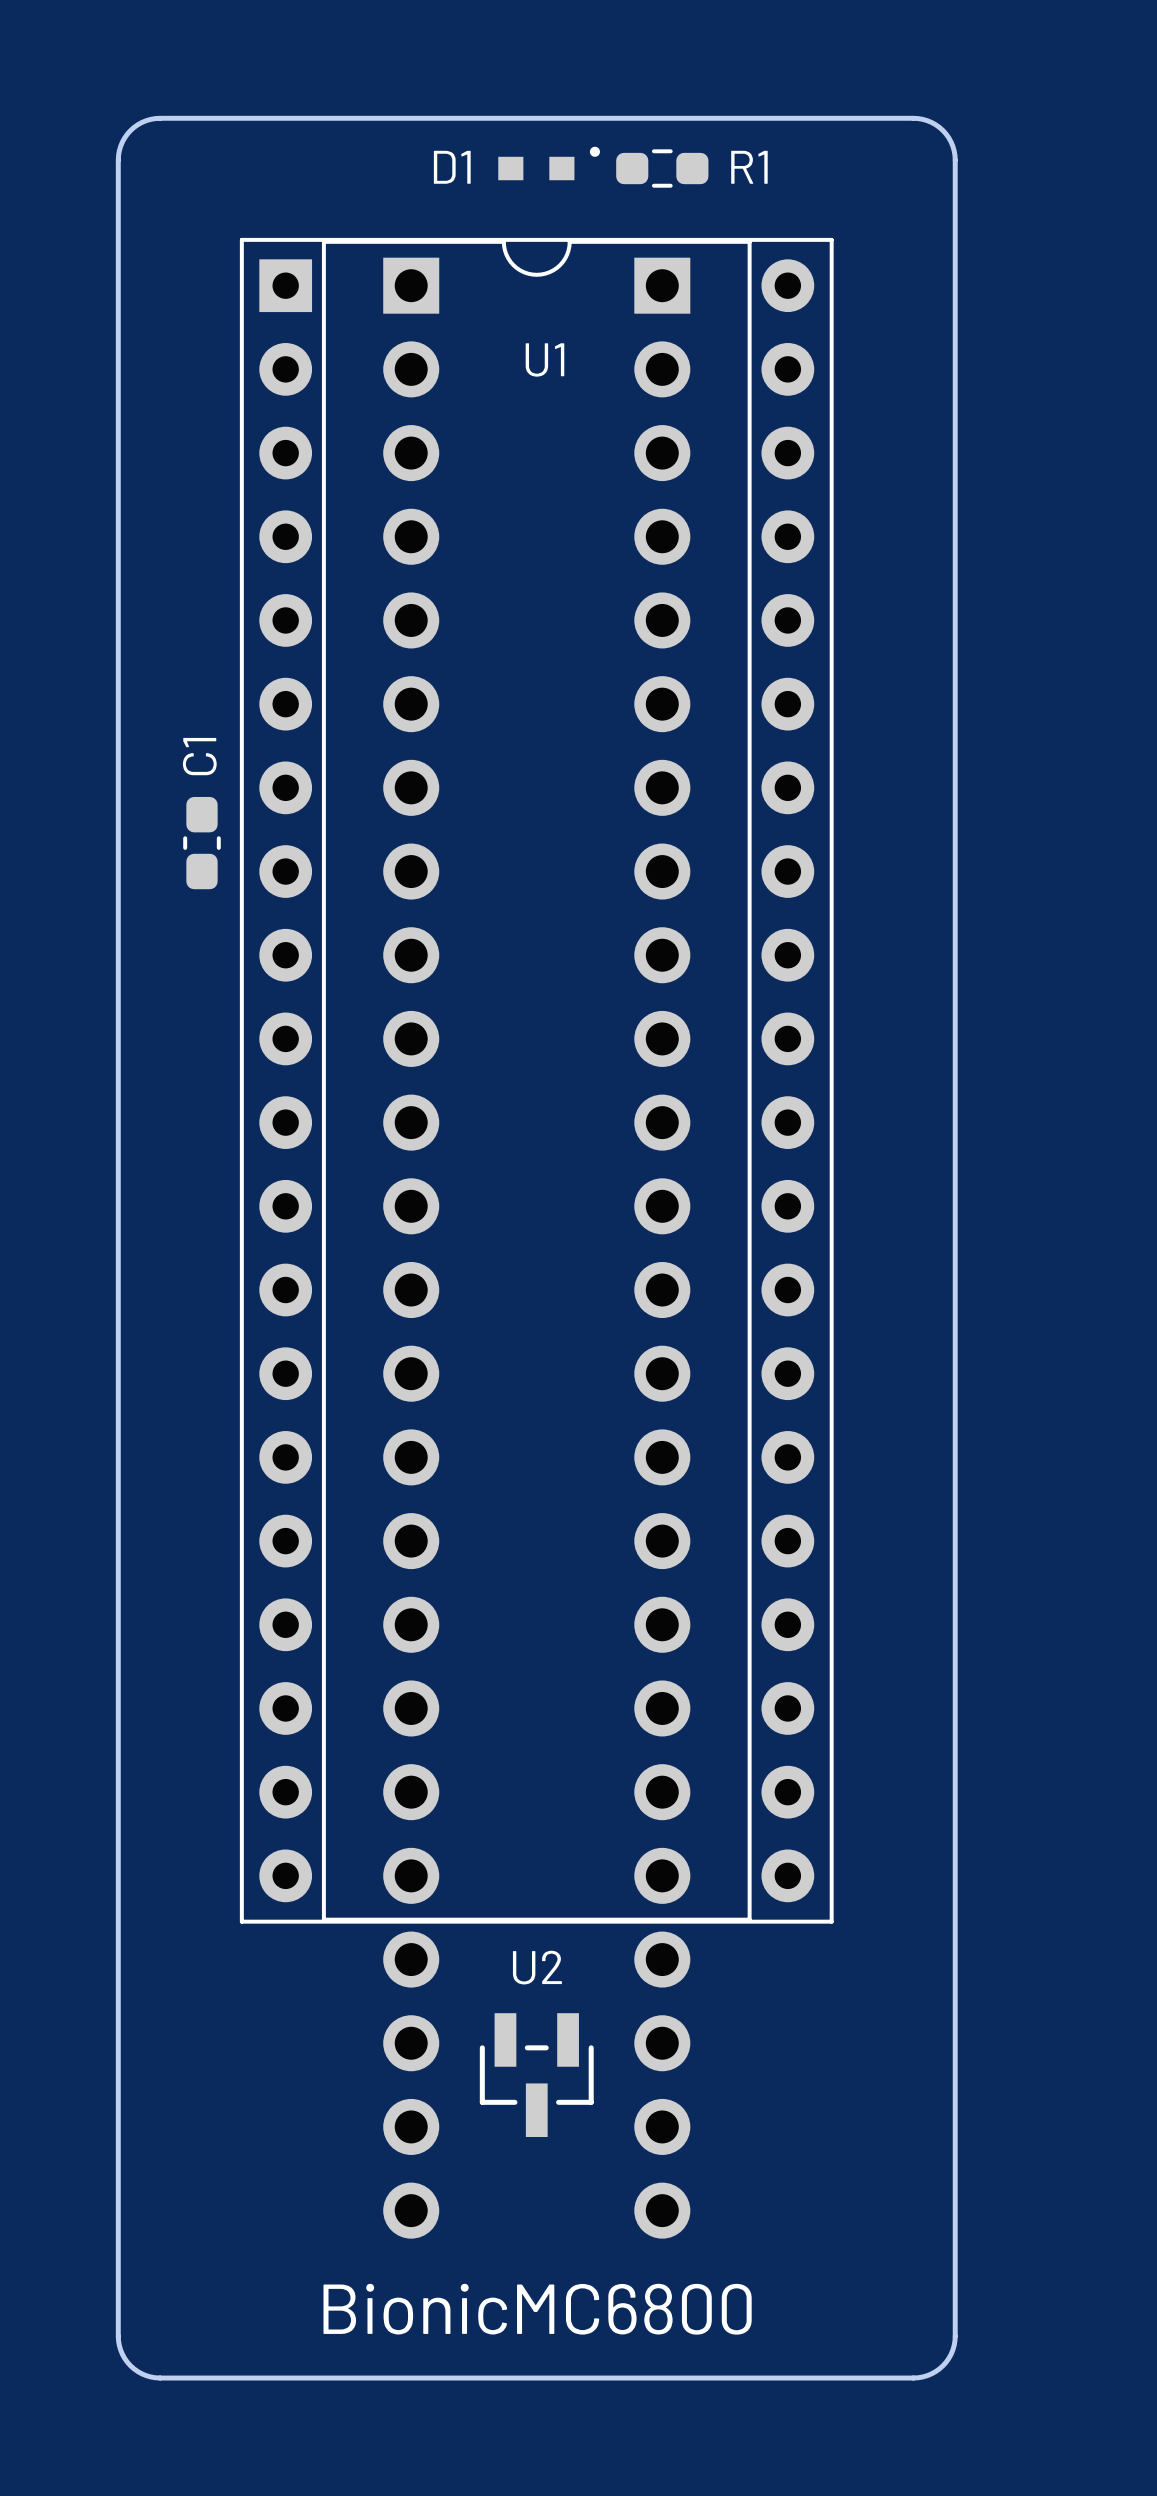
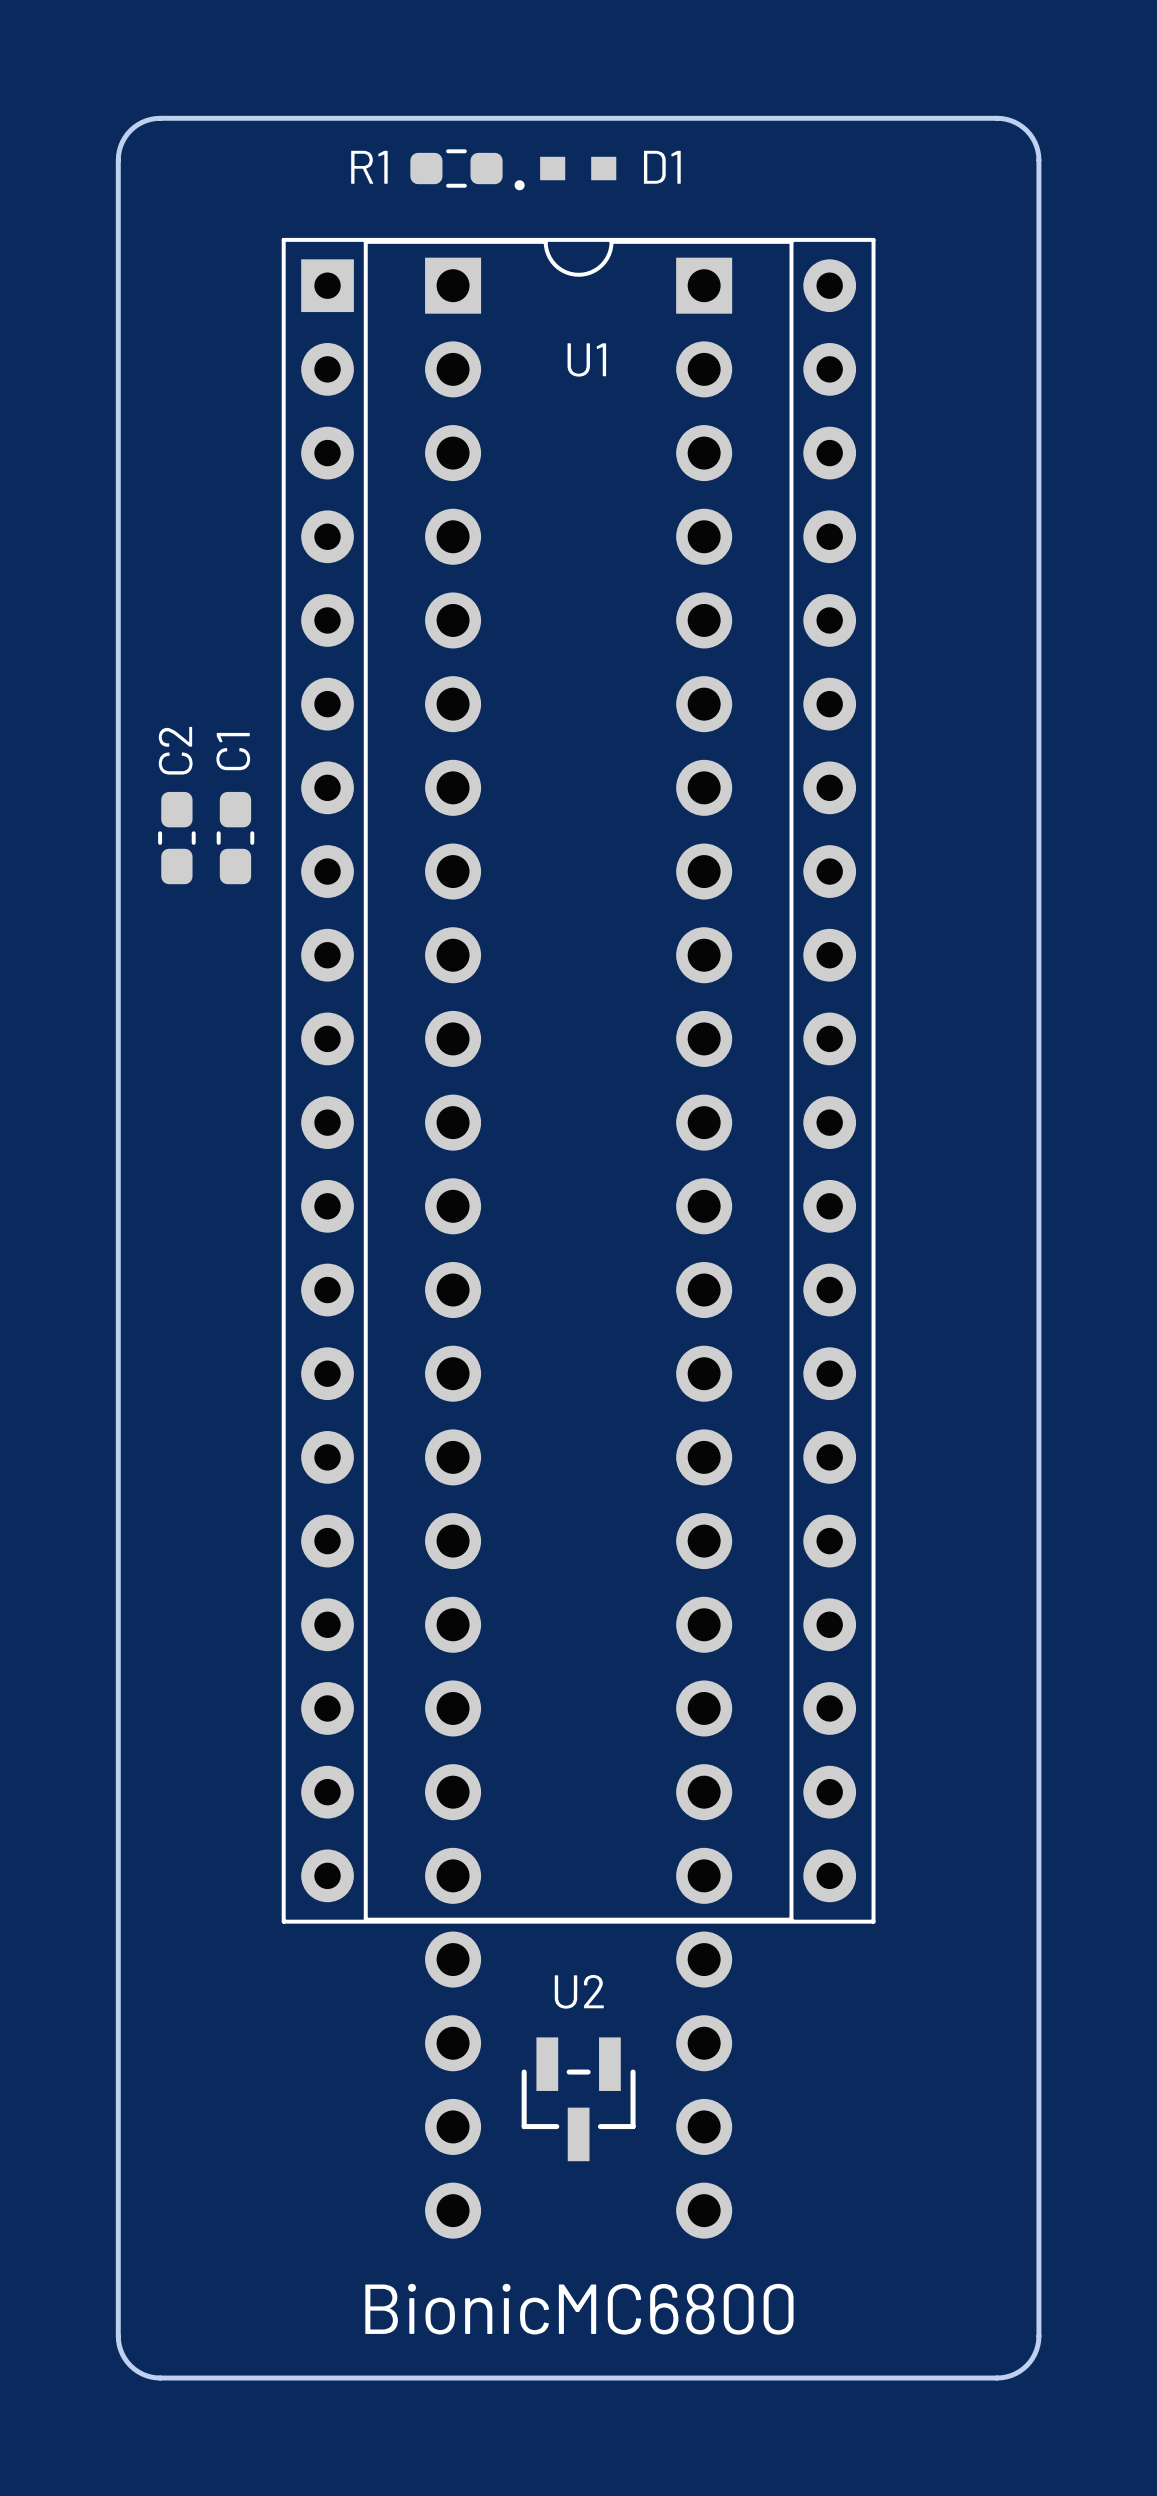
board edge: (913, 118) (931, 122) (942, 130) (952, 146) (955, 160) (955, 2336) (951, 2354) (942, 2365) (927, 2375) (913, 2378) -> (913, 118) (997, 118) (1010, 120) (1023, 127) (1032, 137) (1037, 150) (1038, 160) (1038, 2340) (1034, 2354) (1029, 2362) (1023, 2368) (1010, 2375) (997, 2378) (913, 2378)
D1 rotation: 0° (549, 163) -> 180° (565, 173)
R1 name position: R1 (749, 167) -> R1 (369, 167)
R1 position: (662, 168) -> (456, 168)
C2: none -> (176, 838)
C1 position: (201, 843) -> (235, 838)
U1 position: (536, 1080) -> (578, 1080)
part position: (411, 1248) -> (453, 1248)
part position: (662, 1248) -> (704, 1248)
U2 position: (536, 2075) -> (578, 2099)
text position: BionicMC6800 (537, 2309) -> BionicMC6800 (579, 2309)

